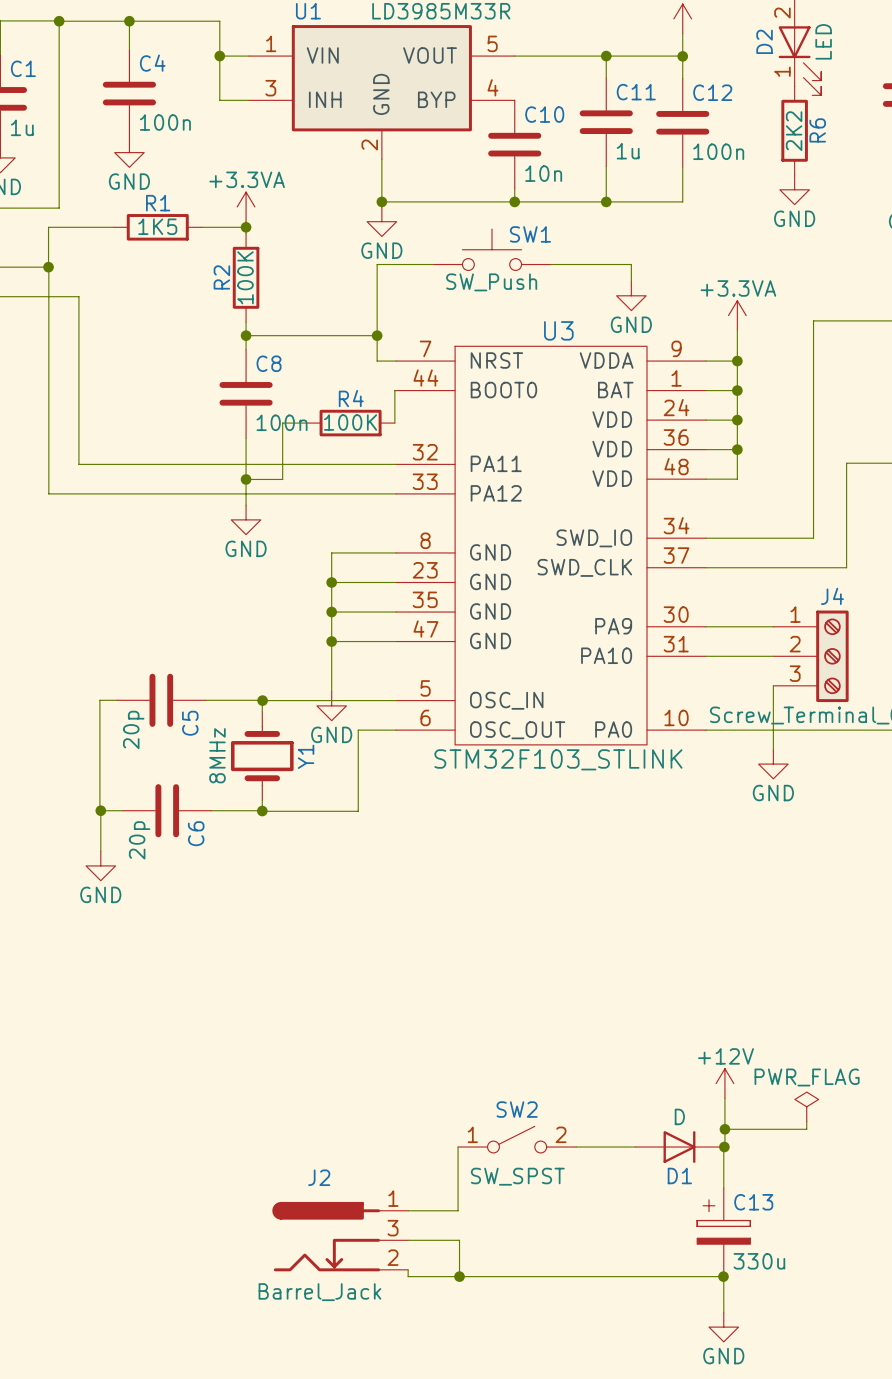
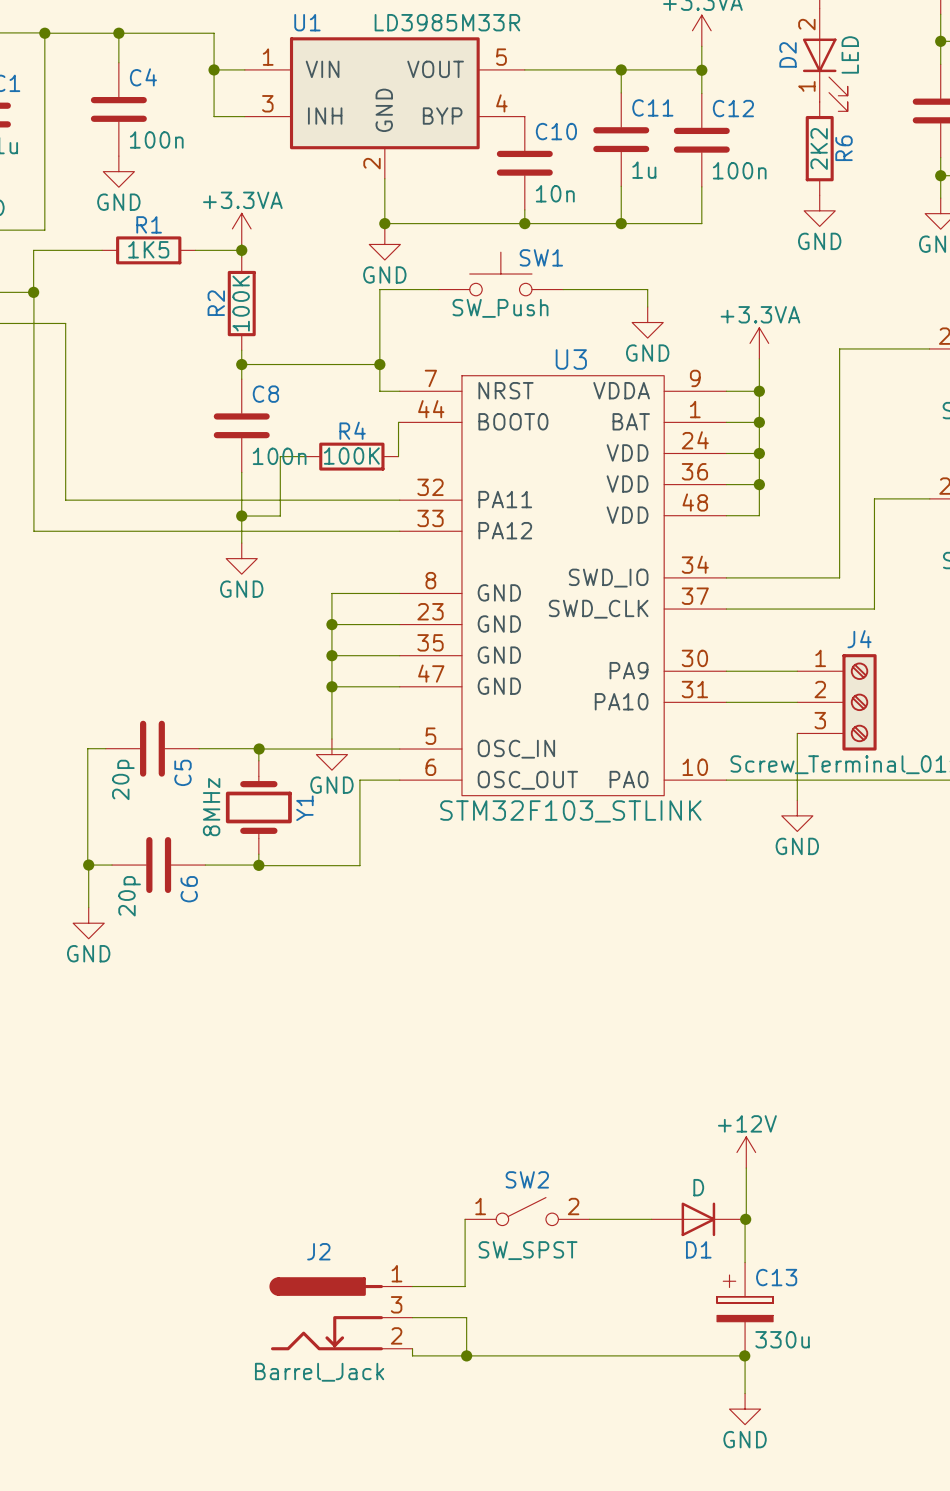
power symbol: PWR_FLAG (806, 1106) -> none
wire: (806, 1121) (806, 1129) (724, 1129) -> none
junction: (724, 1129) -> none

